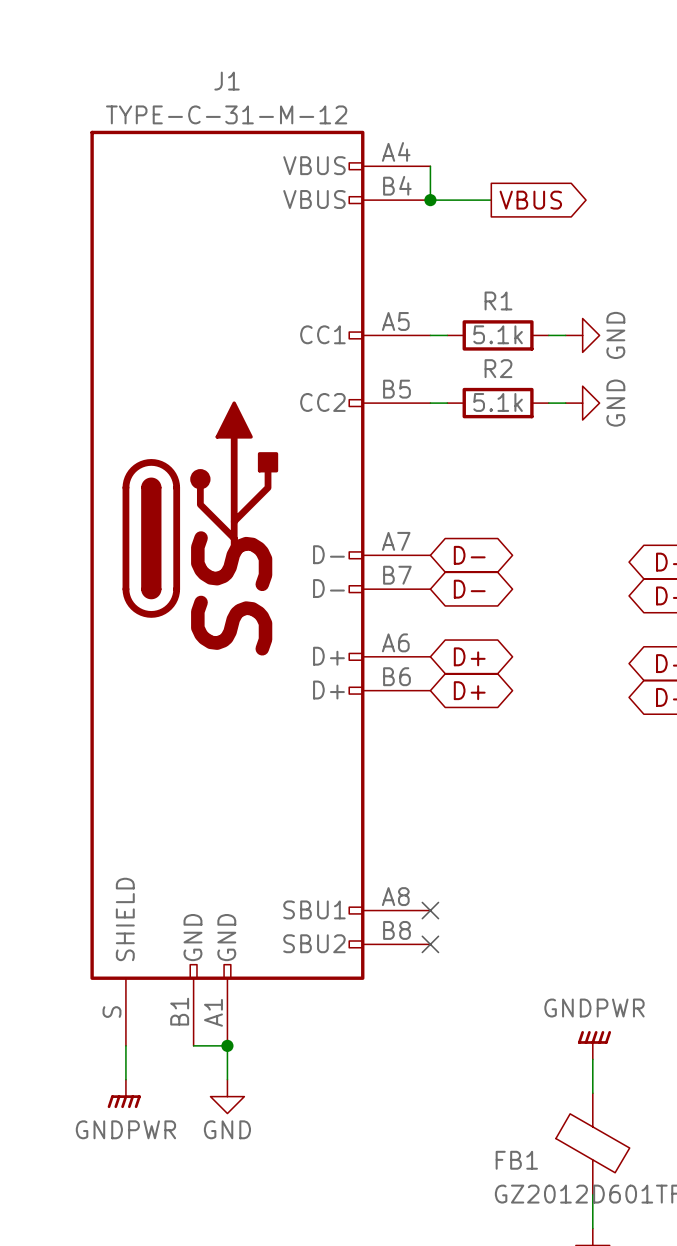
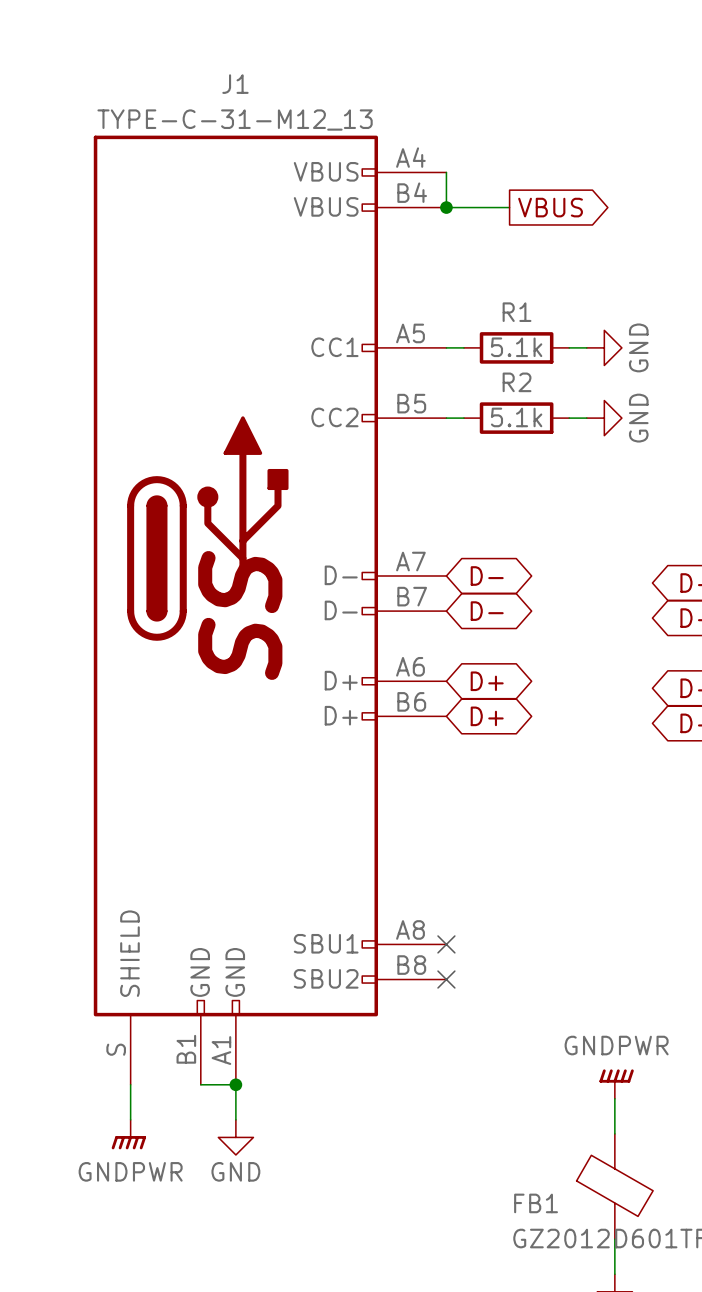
J1 value: TYPE-C-31-M-12 (226, 114) -> TYPE-C-31-M12_13 (235, 120)

